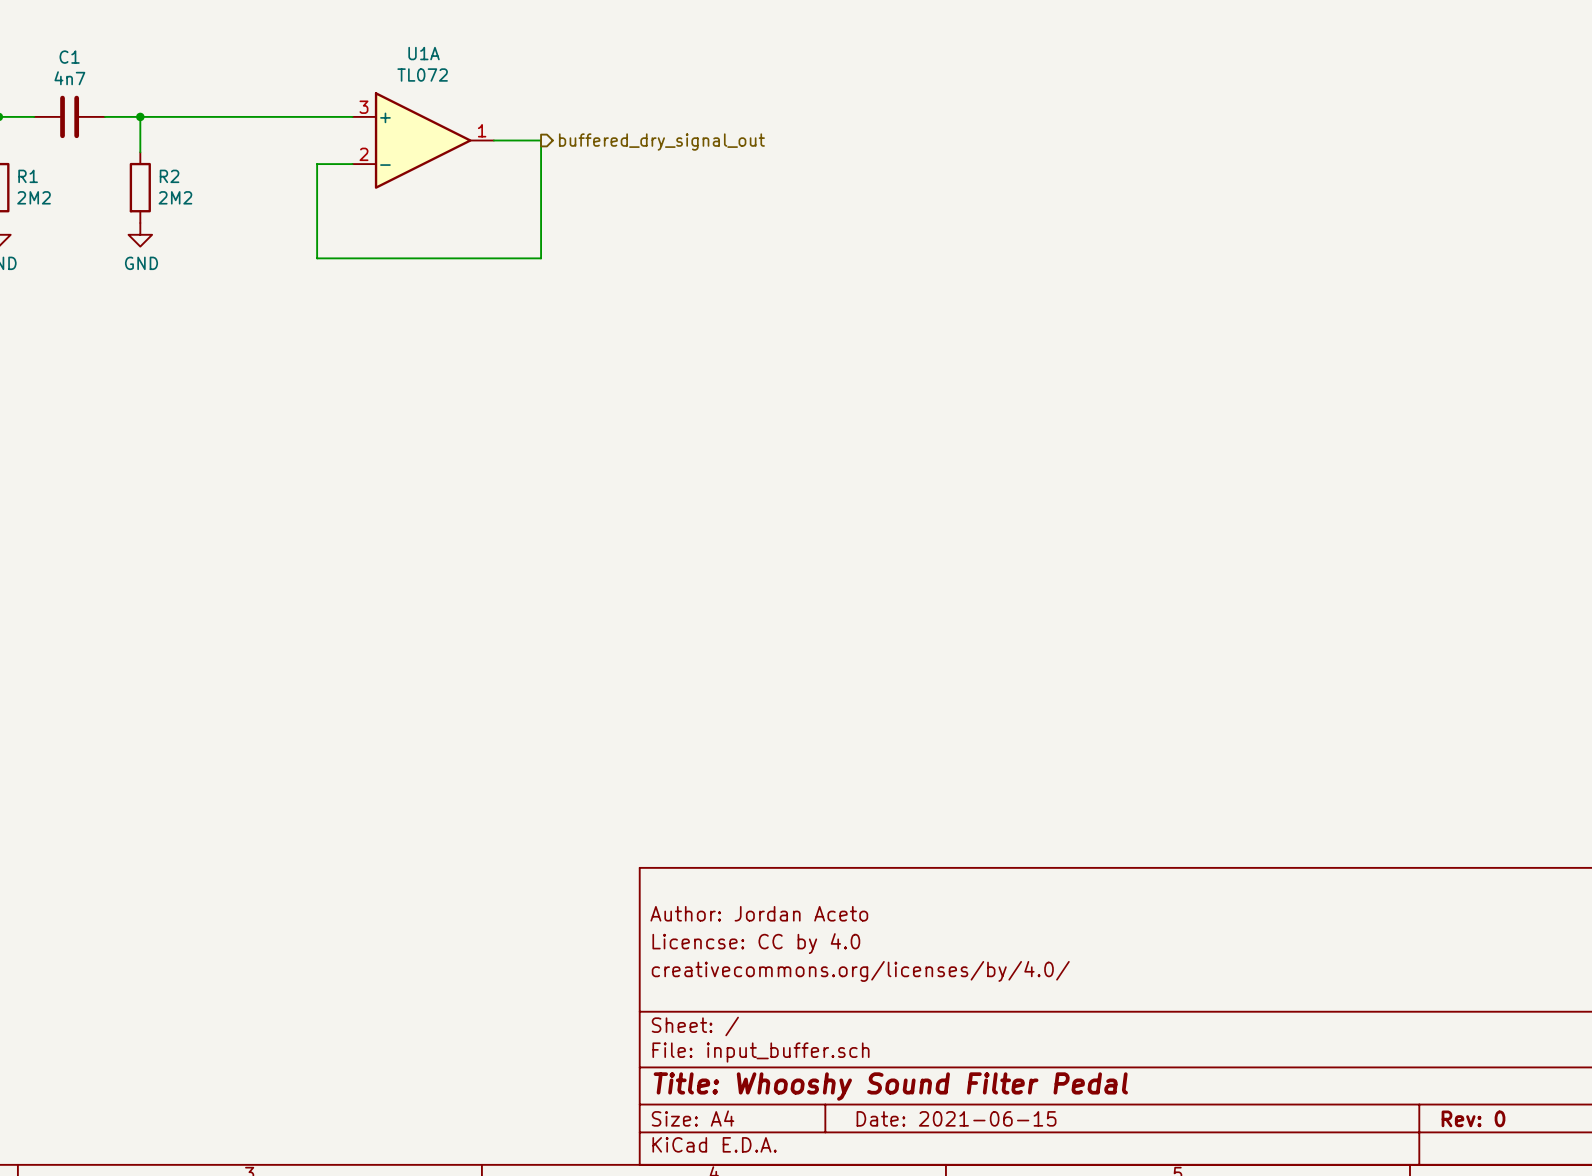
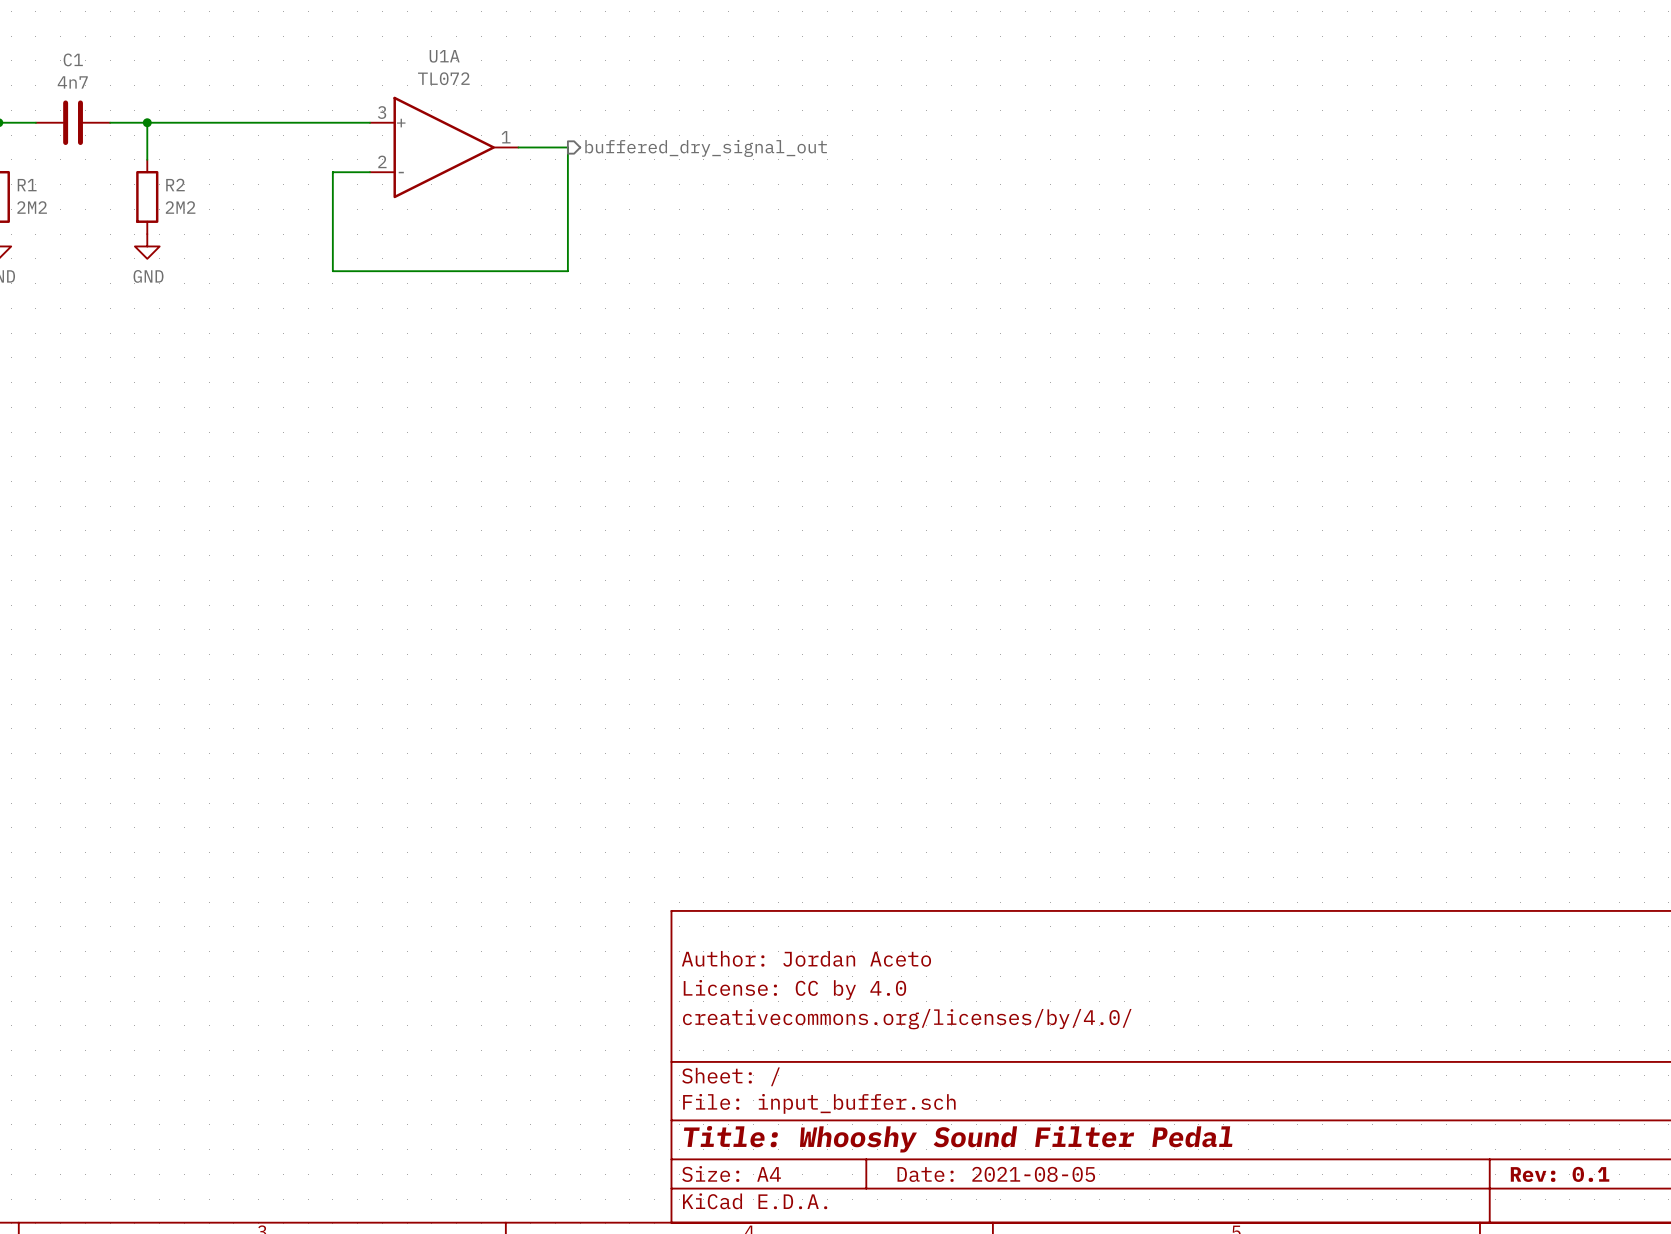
title block: Licencse: CC by 4.0 (756, 943) -> License: CC by 4.0 (794, 989)
title block: Date: 2021-06-15 (956, 1118) -> Date: 2021-08-05 (996, 1174)
title block: Rev: 0 (1473, 1118) -> Rev: 0.1 (1560, 1174)

